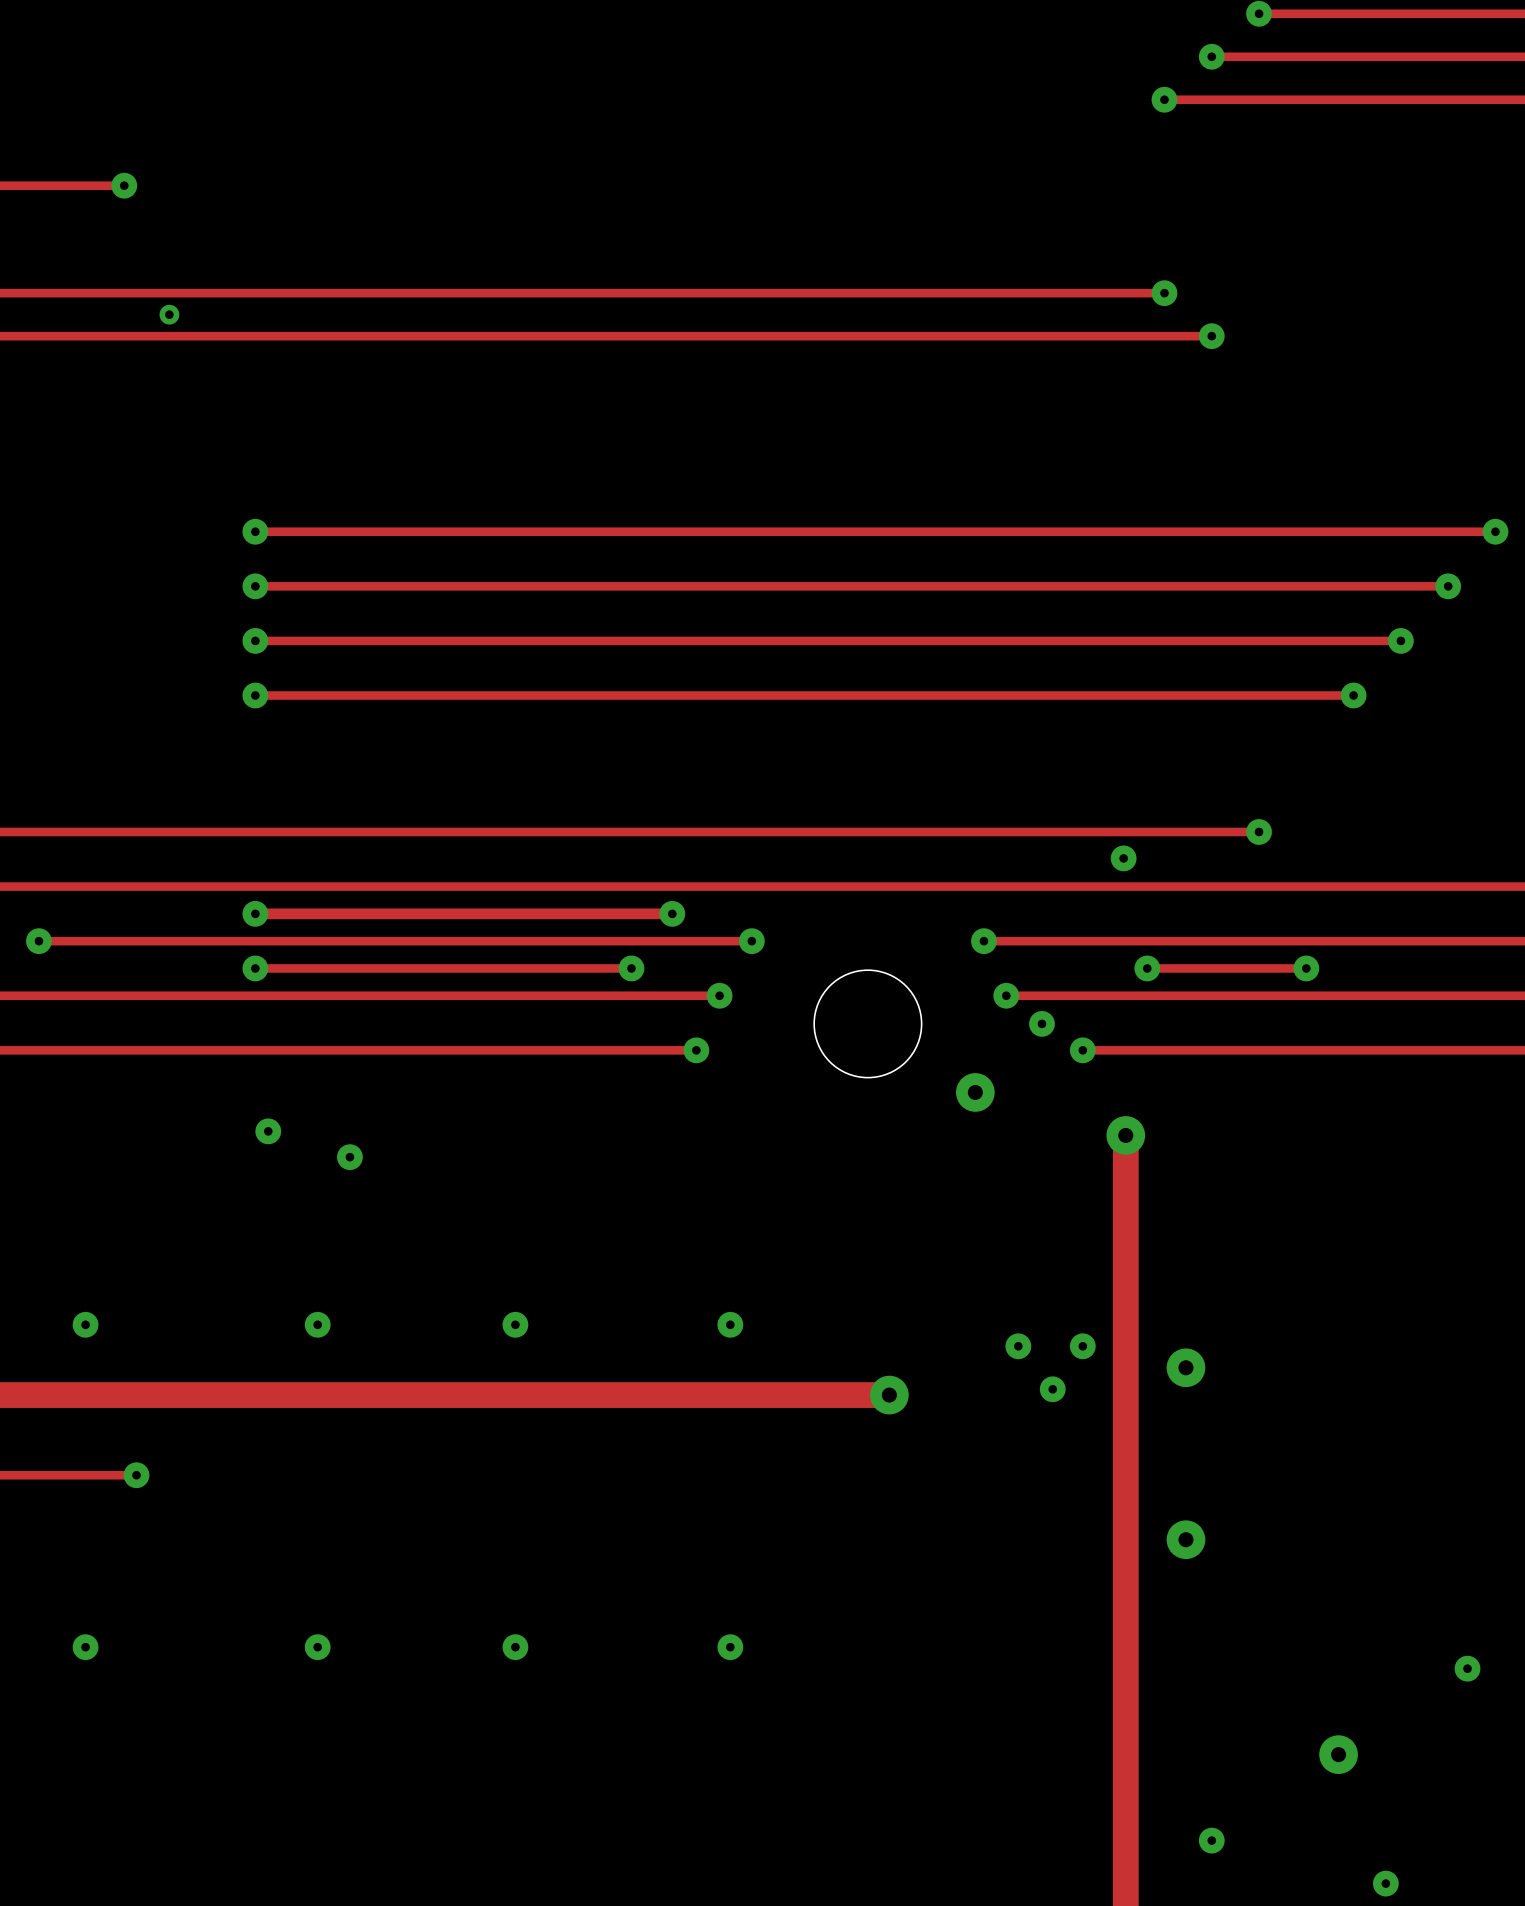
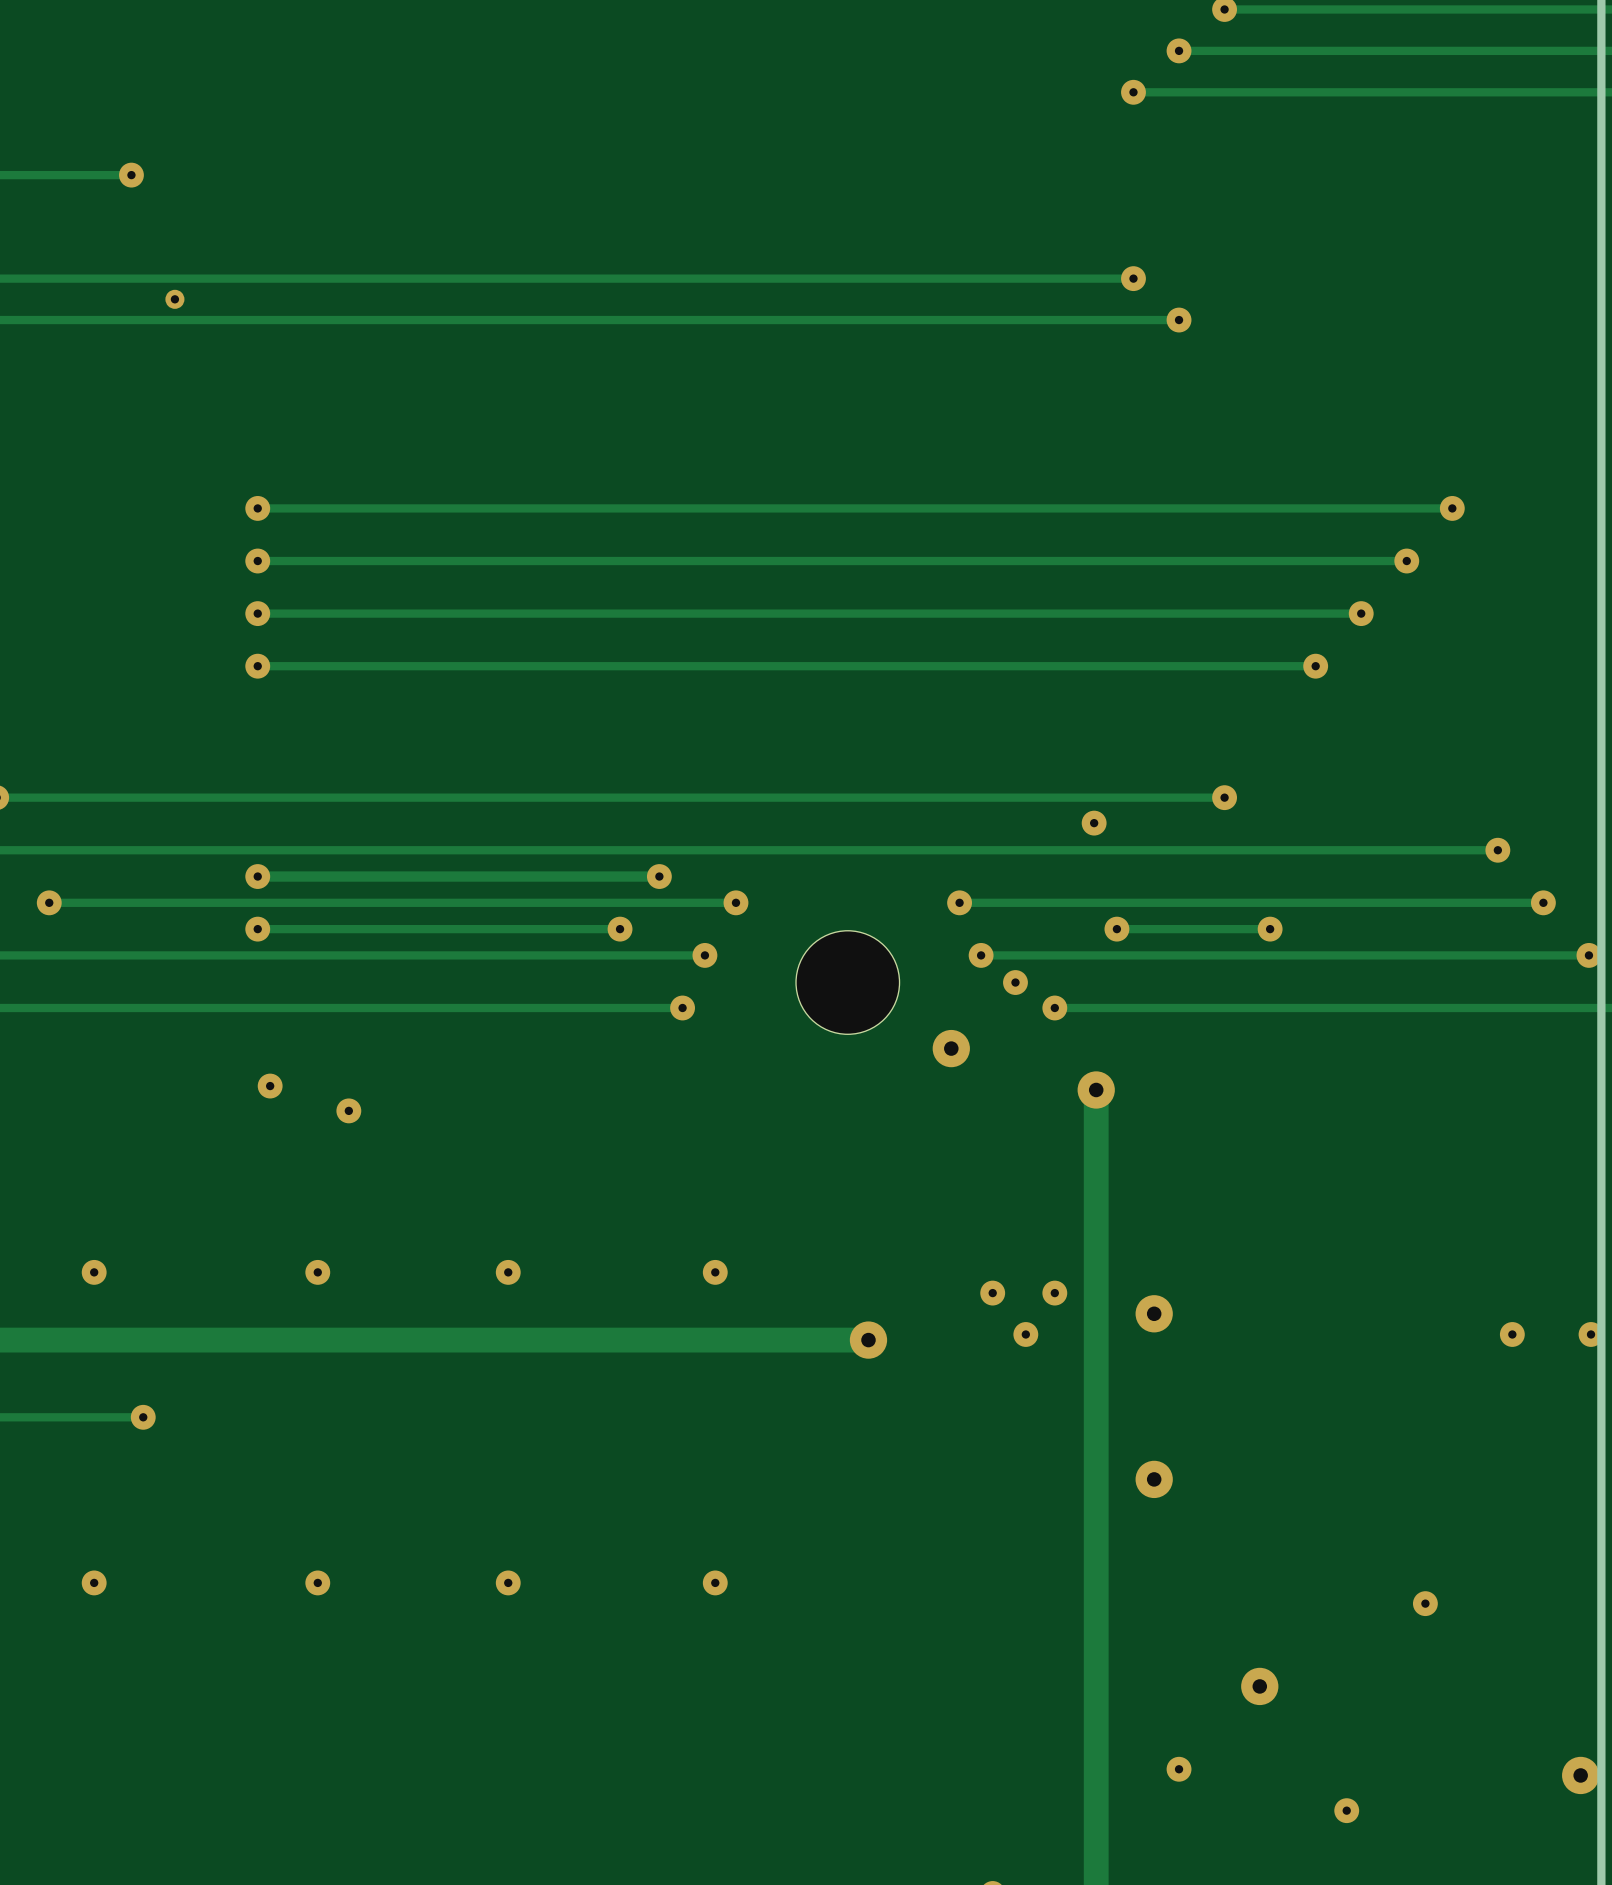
via position: (1338, 1754) -> (1259, 1686)

